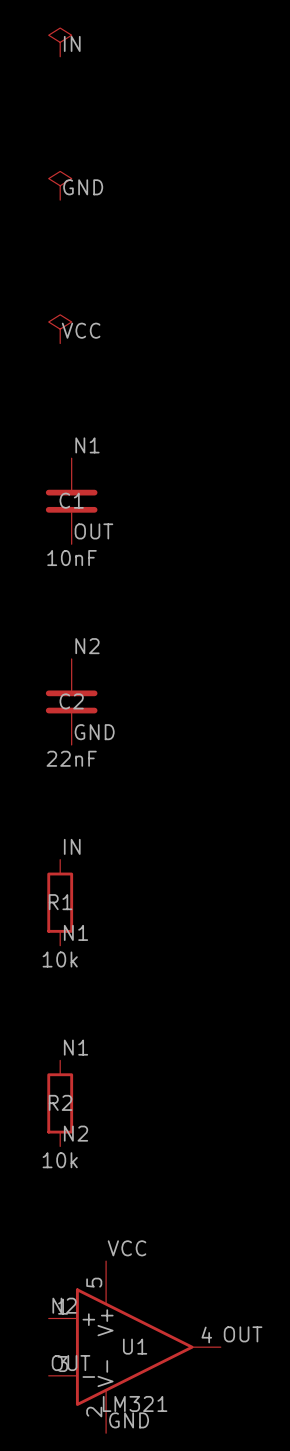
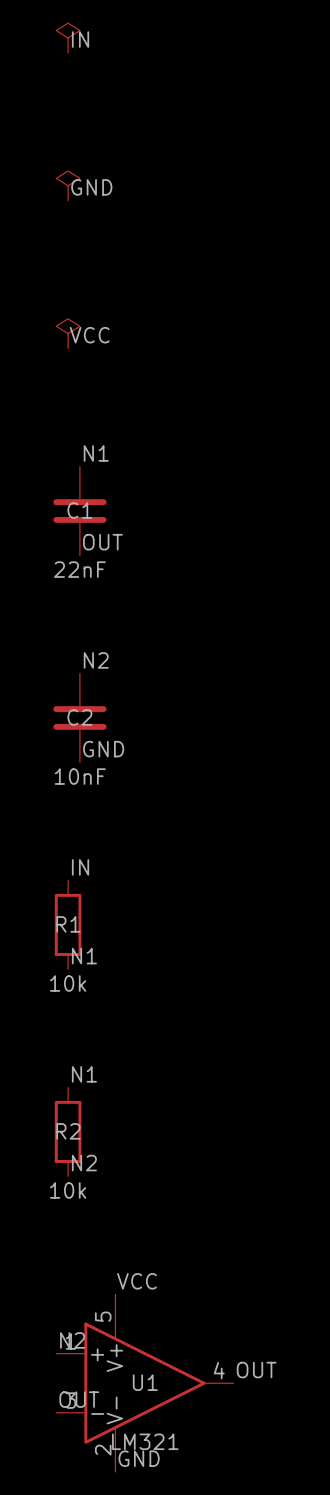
C1 value: 10nF (72, 558) -> 22nF (79, 569)
C2 value: 22nF (71, 758) -> 10nF (80, 776)

